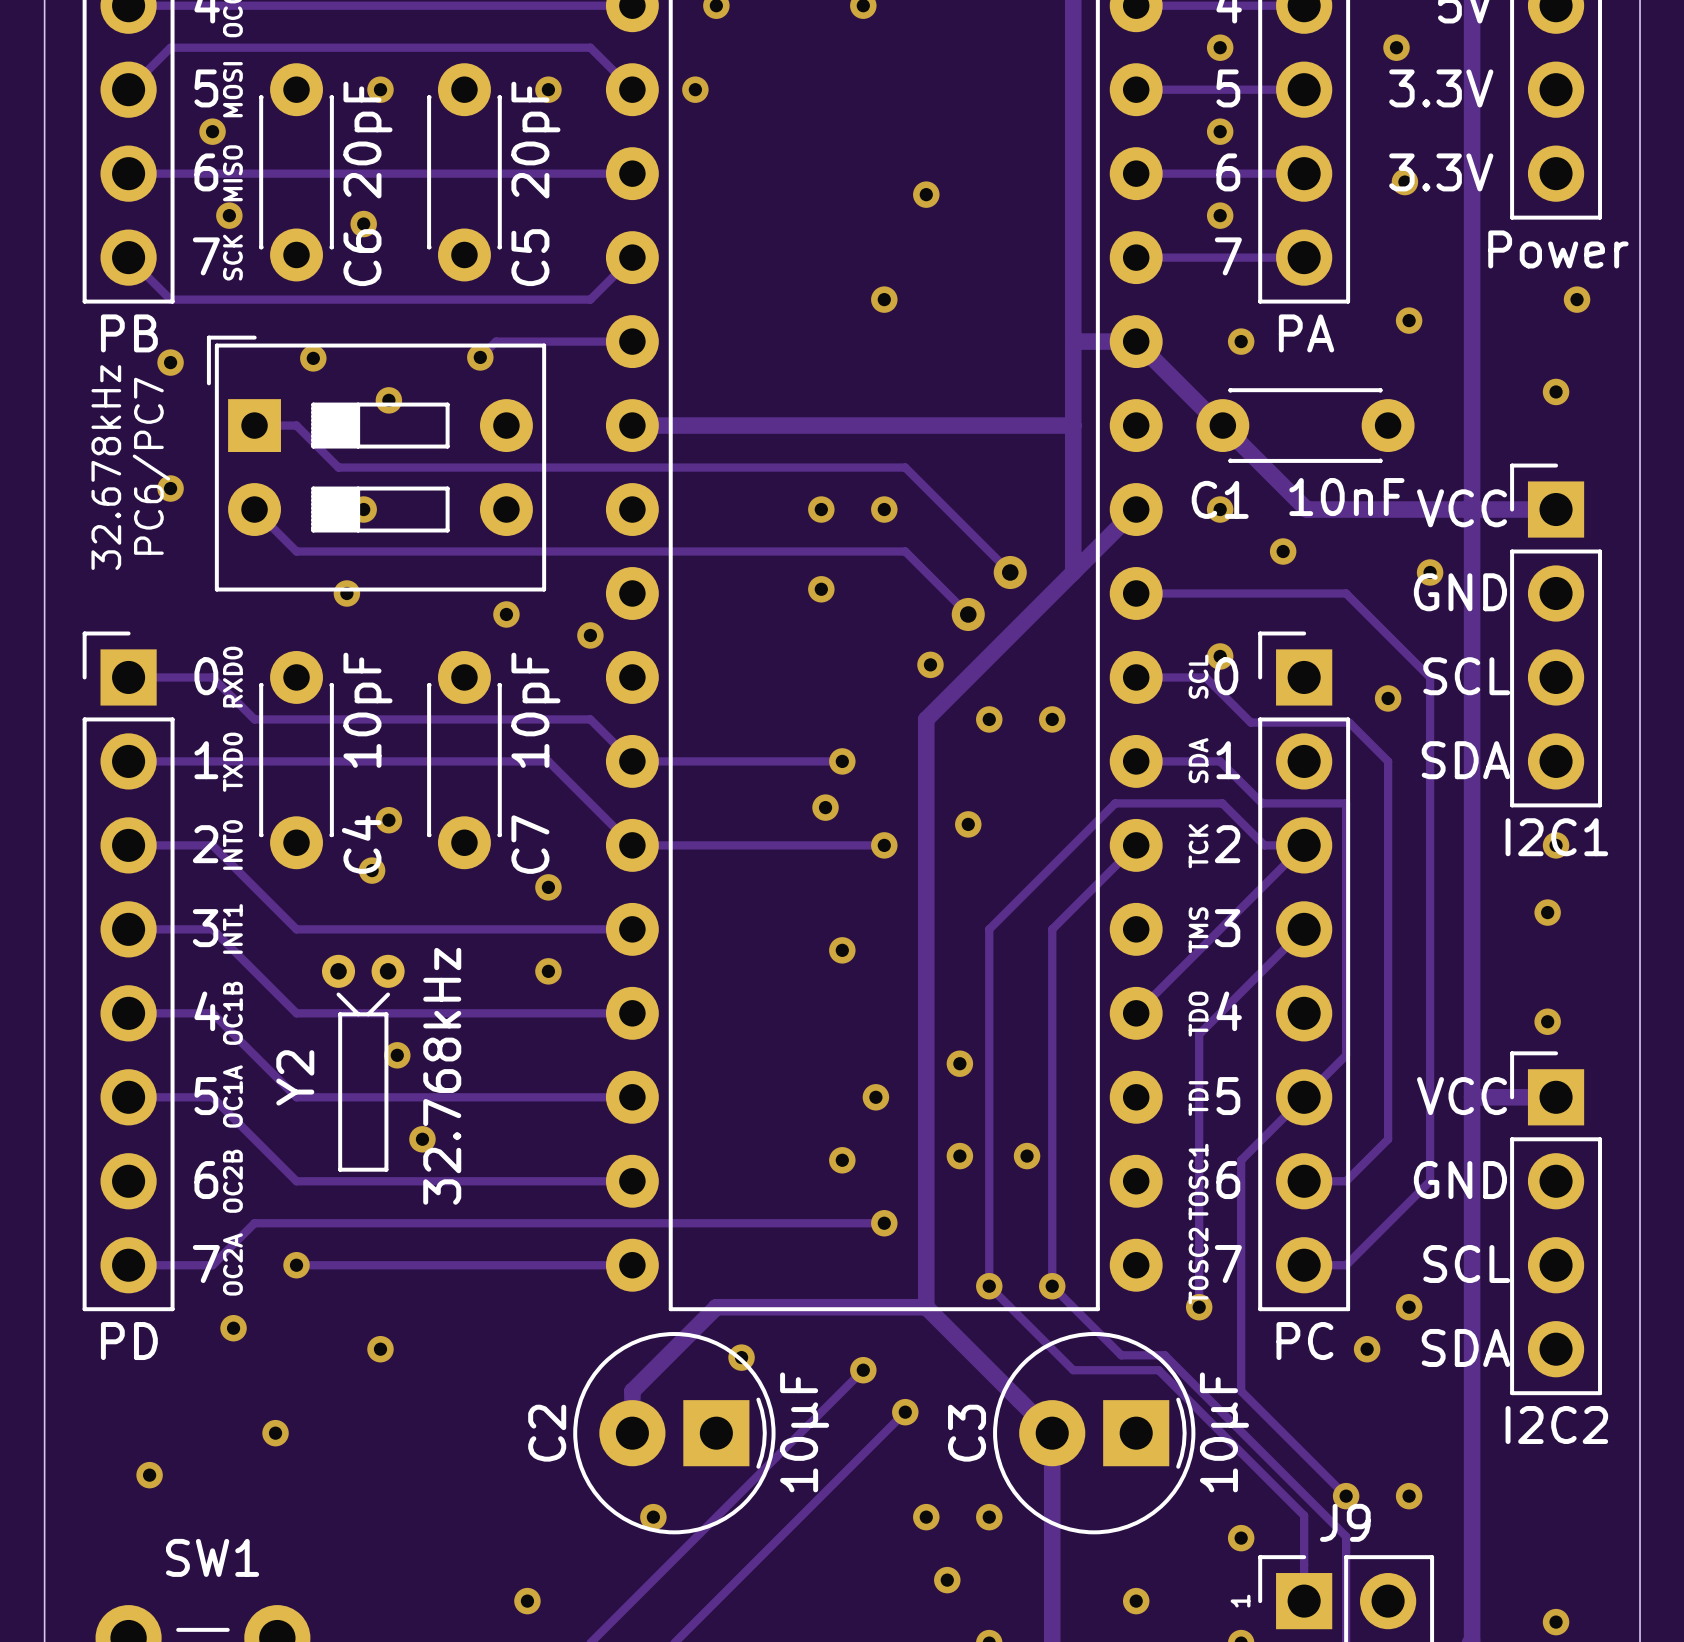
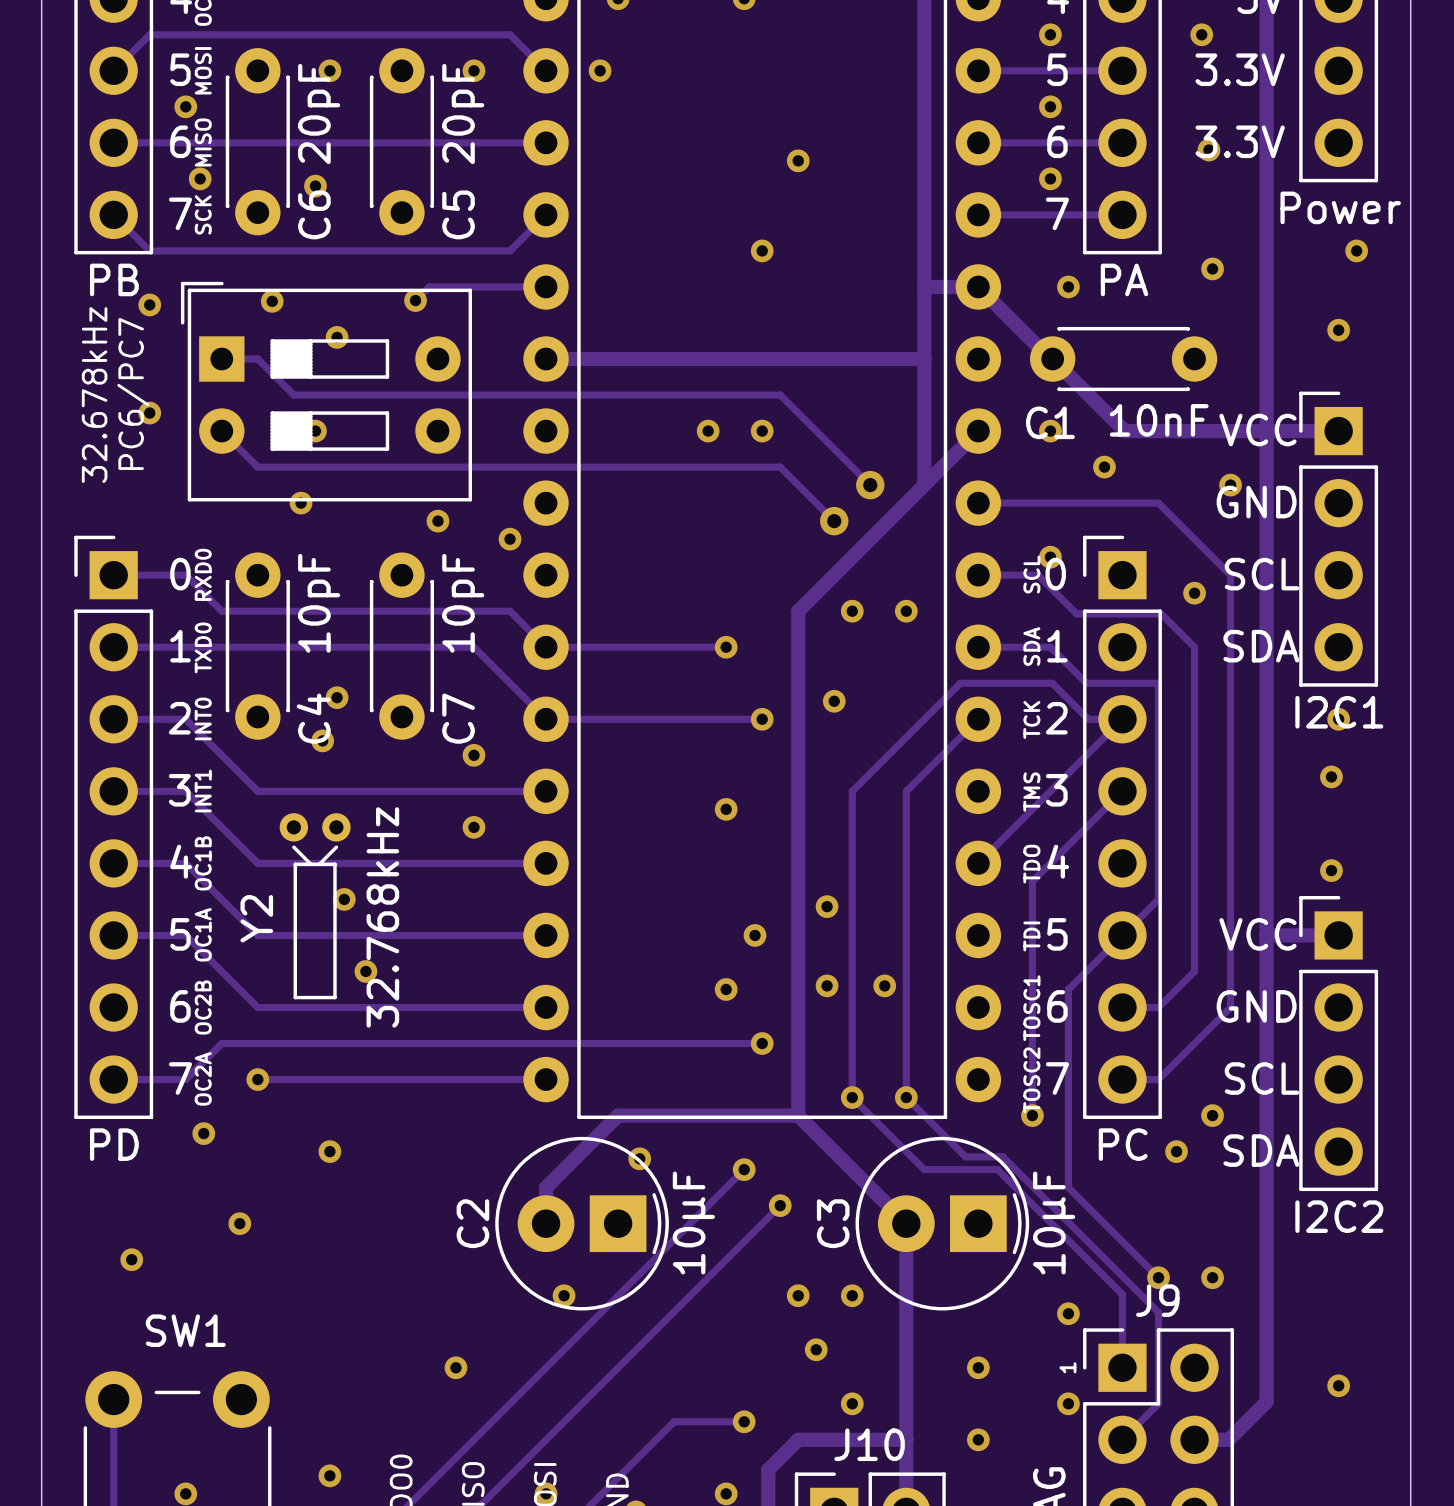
via: (821, 589) -> none
via: (930, 664) -> none
via: (825, 807) -> none

